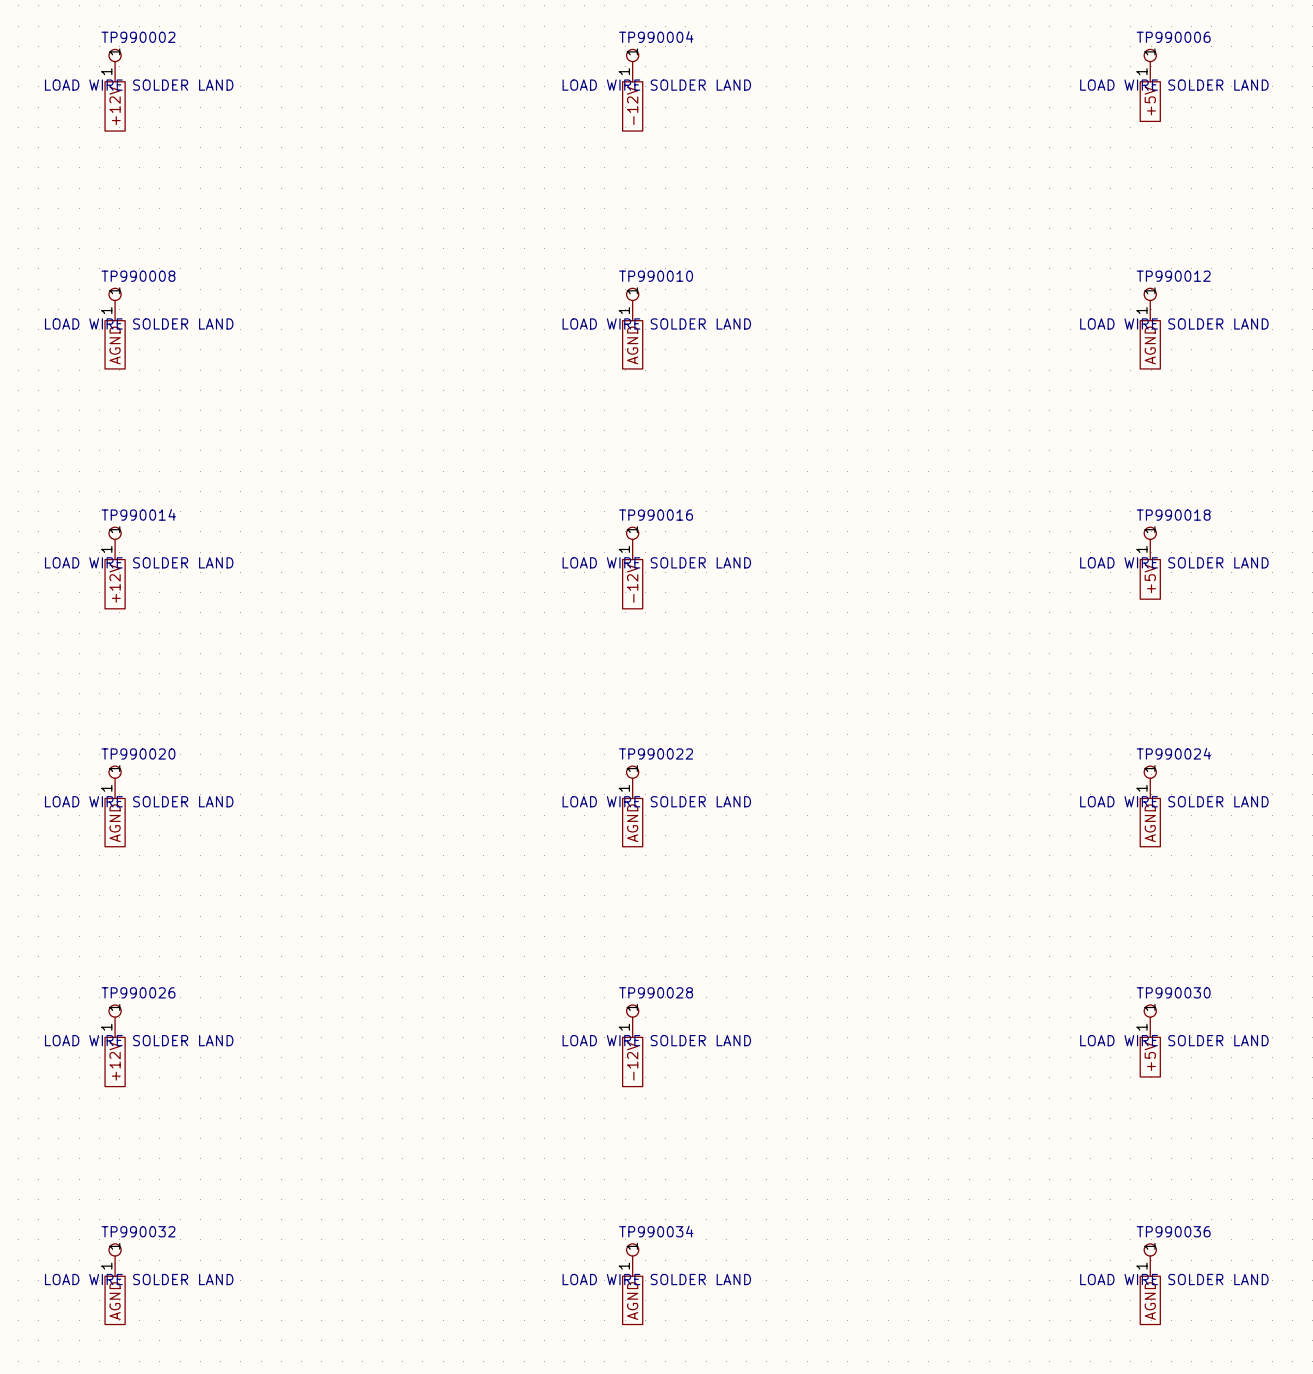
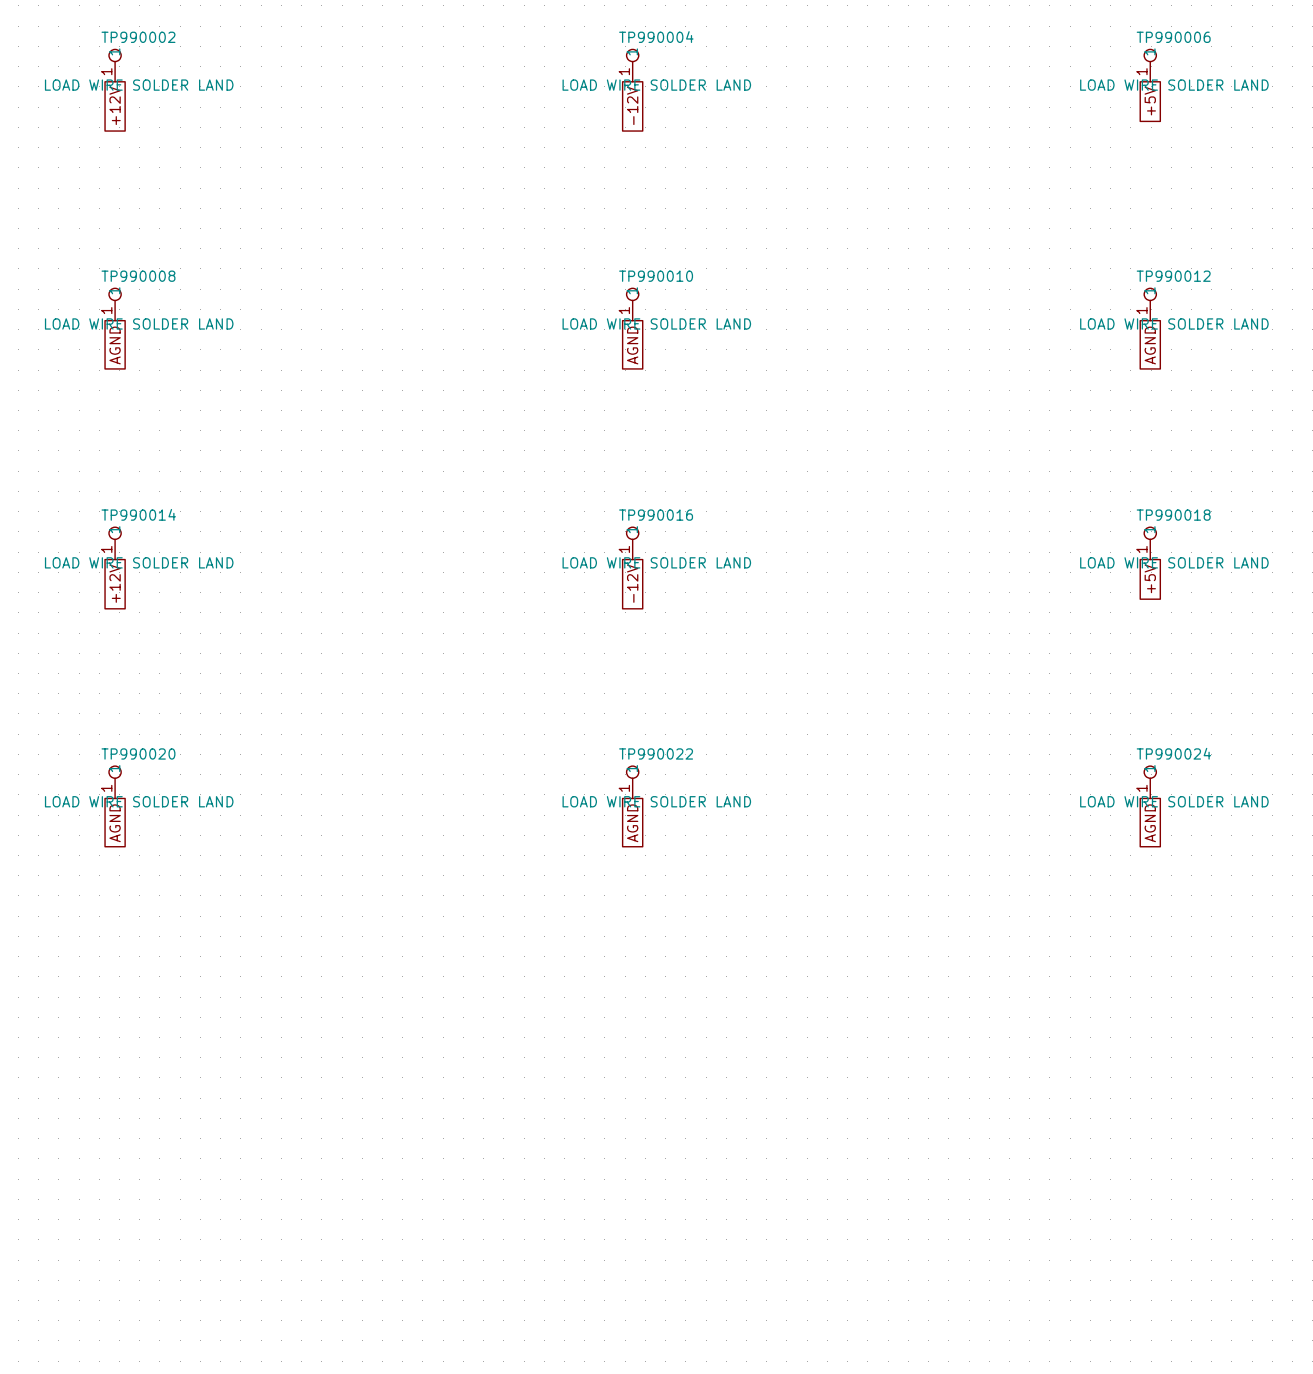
TP990026: LOAD WIRE SOLDER LAND (115, 1021) -> none
TP990028: LOAD WIRE SOLDER LAND (632, 1021) -> none
TP990030: LOAD WIRE SOLDER LAND (1150, 1021) -> none
global label: +5V (1150, 1056) -> none
global label: +12V (115, 1061) -> none
global label: -12V (632, 1061) -> none
TP990032: LOAD WIRE SOLDER LAND (115, 1260) -> none
TP990034: LOAD WIRE SOLDER LAND (632, 1260) -> none
TP990036: LOAD WIRE SOLDER LAND (1150, 1260) -> none
global label: AGND (115, 1301) -> none
global label: AGND (632, 1301) -> none
global label: AGND (1150, 1301) -> none

